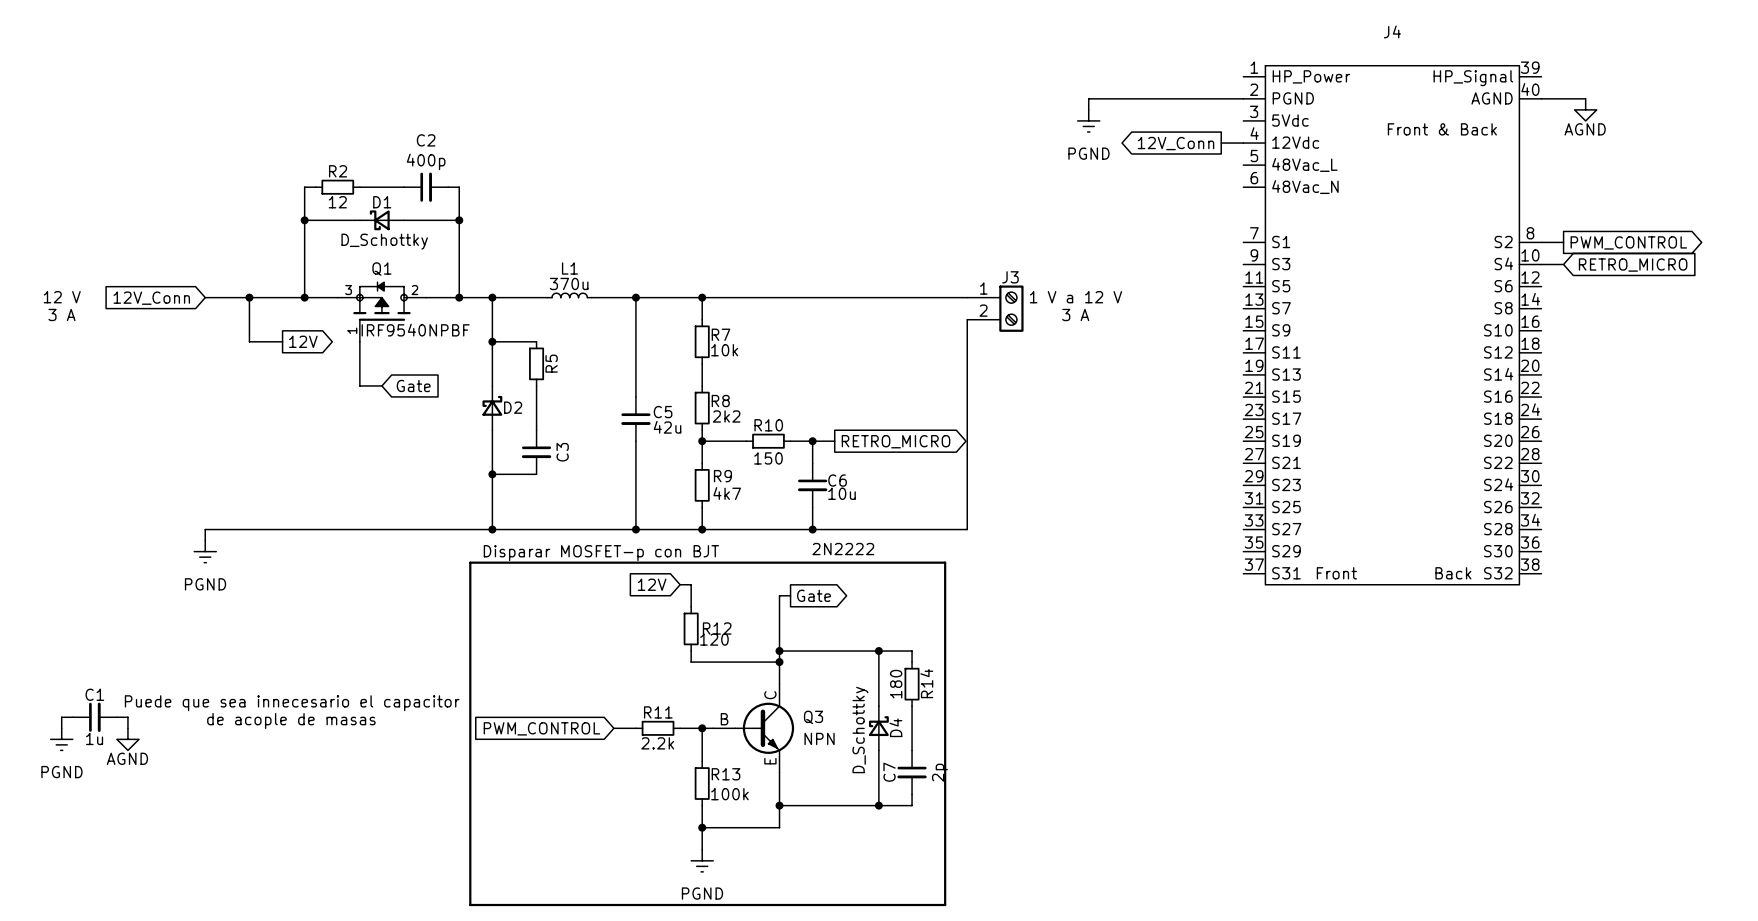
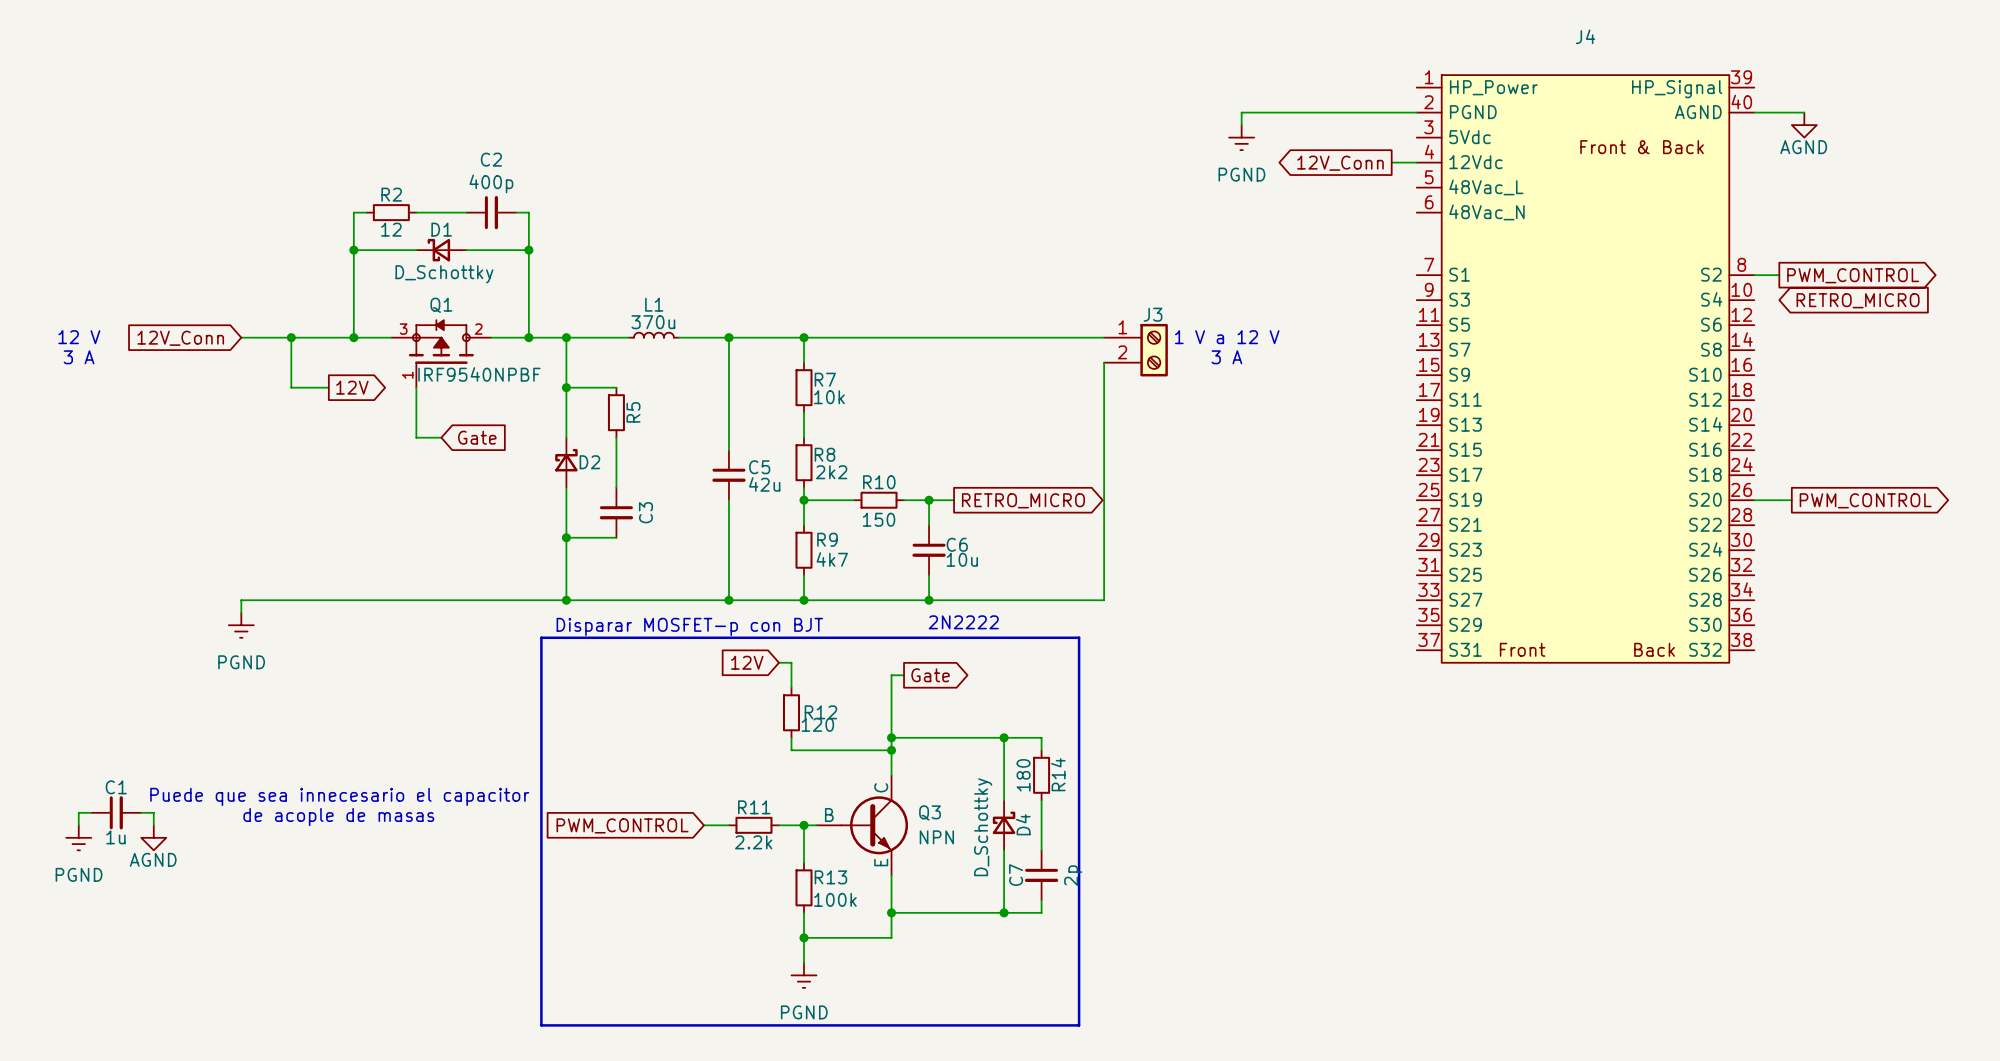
wire: (1541, 264) (1563, 264) -> none
wire: none -> (1754, 500) (1791, 500)
global label: none -> PWM_CONTROL (1865, 500)

